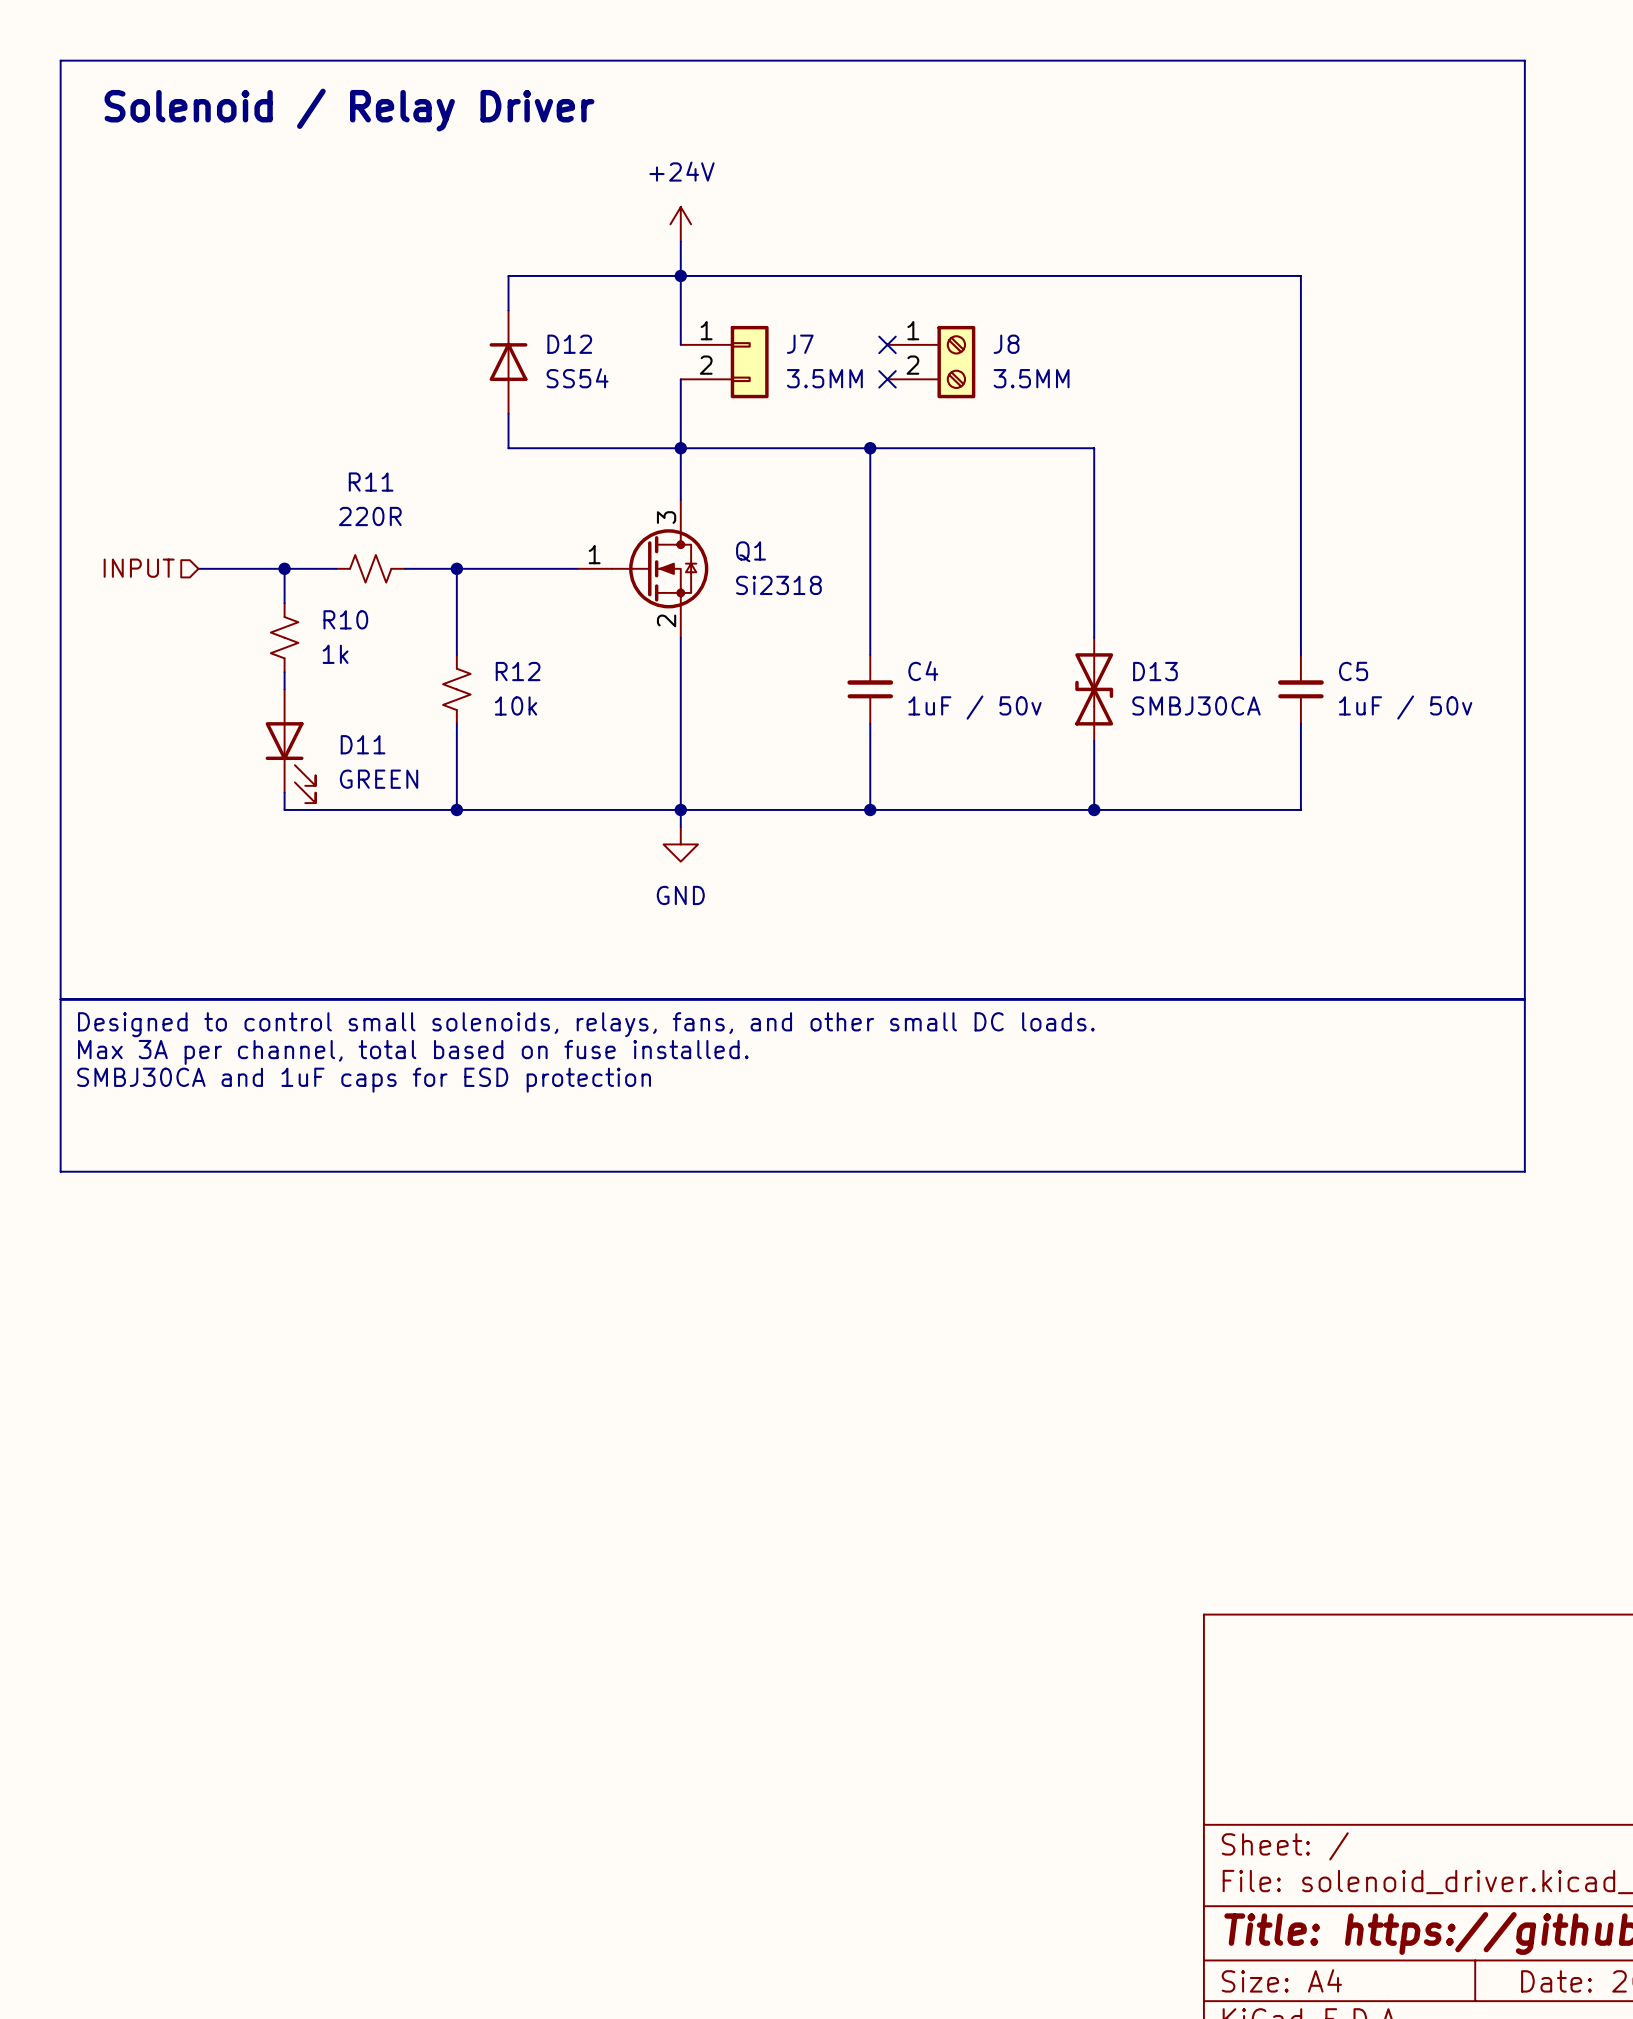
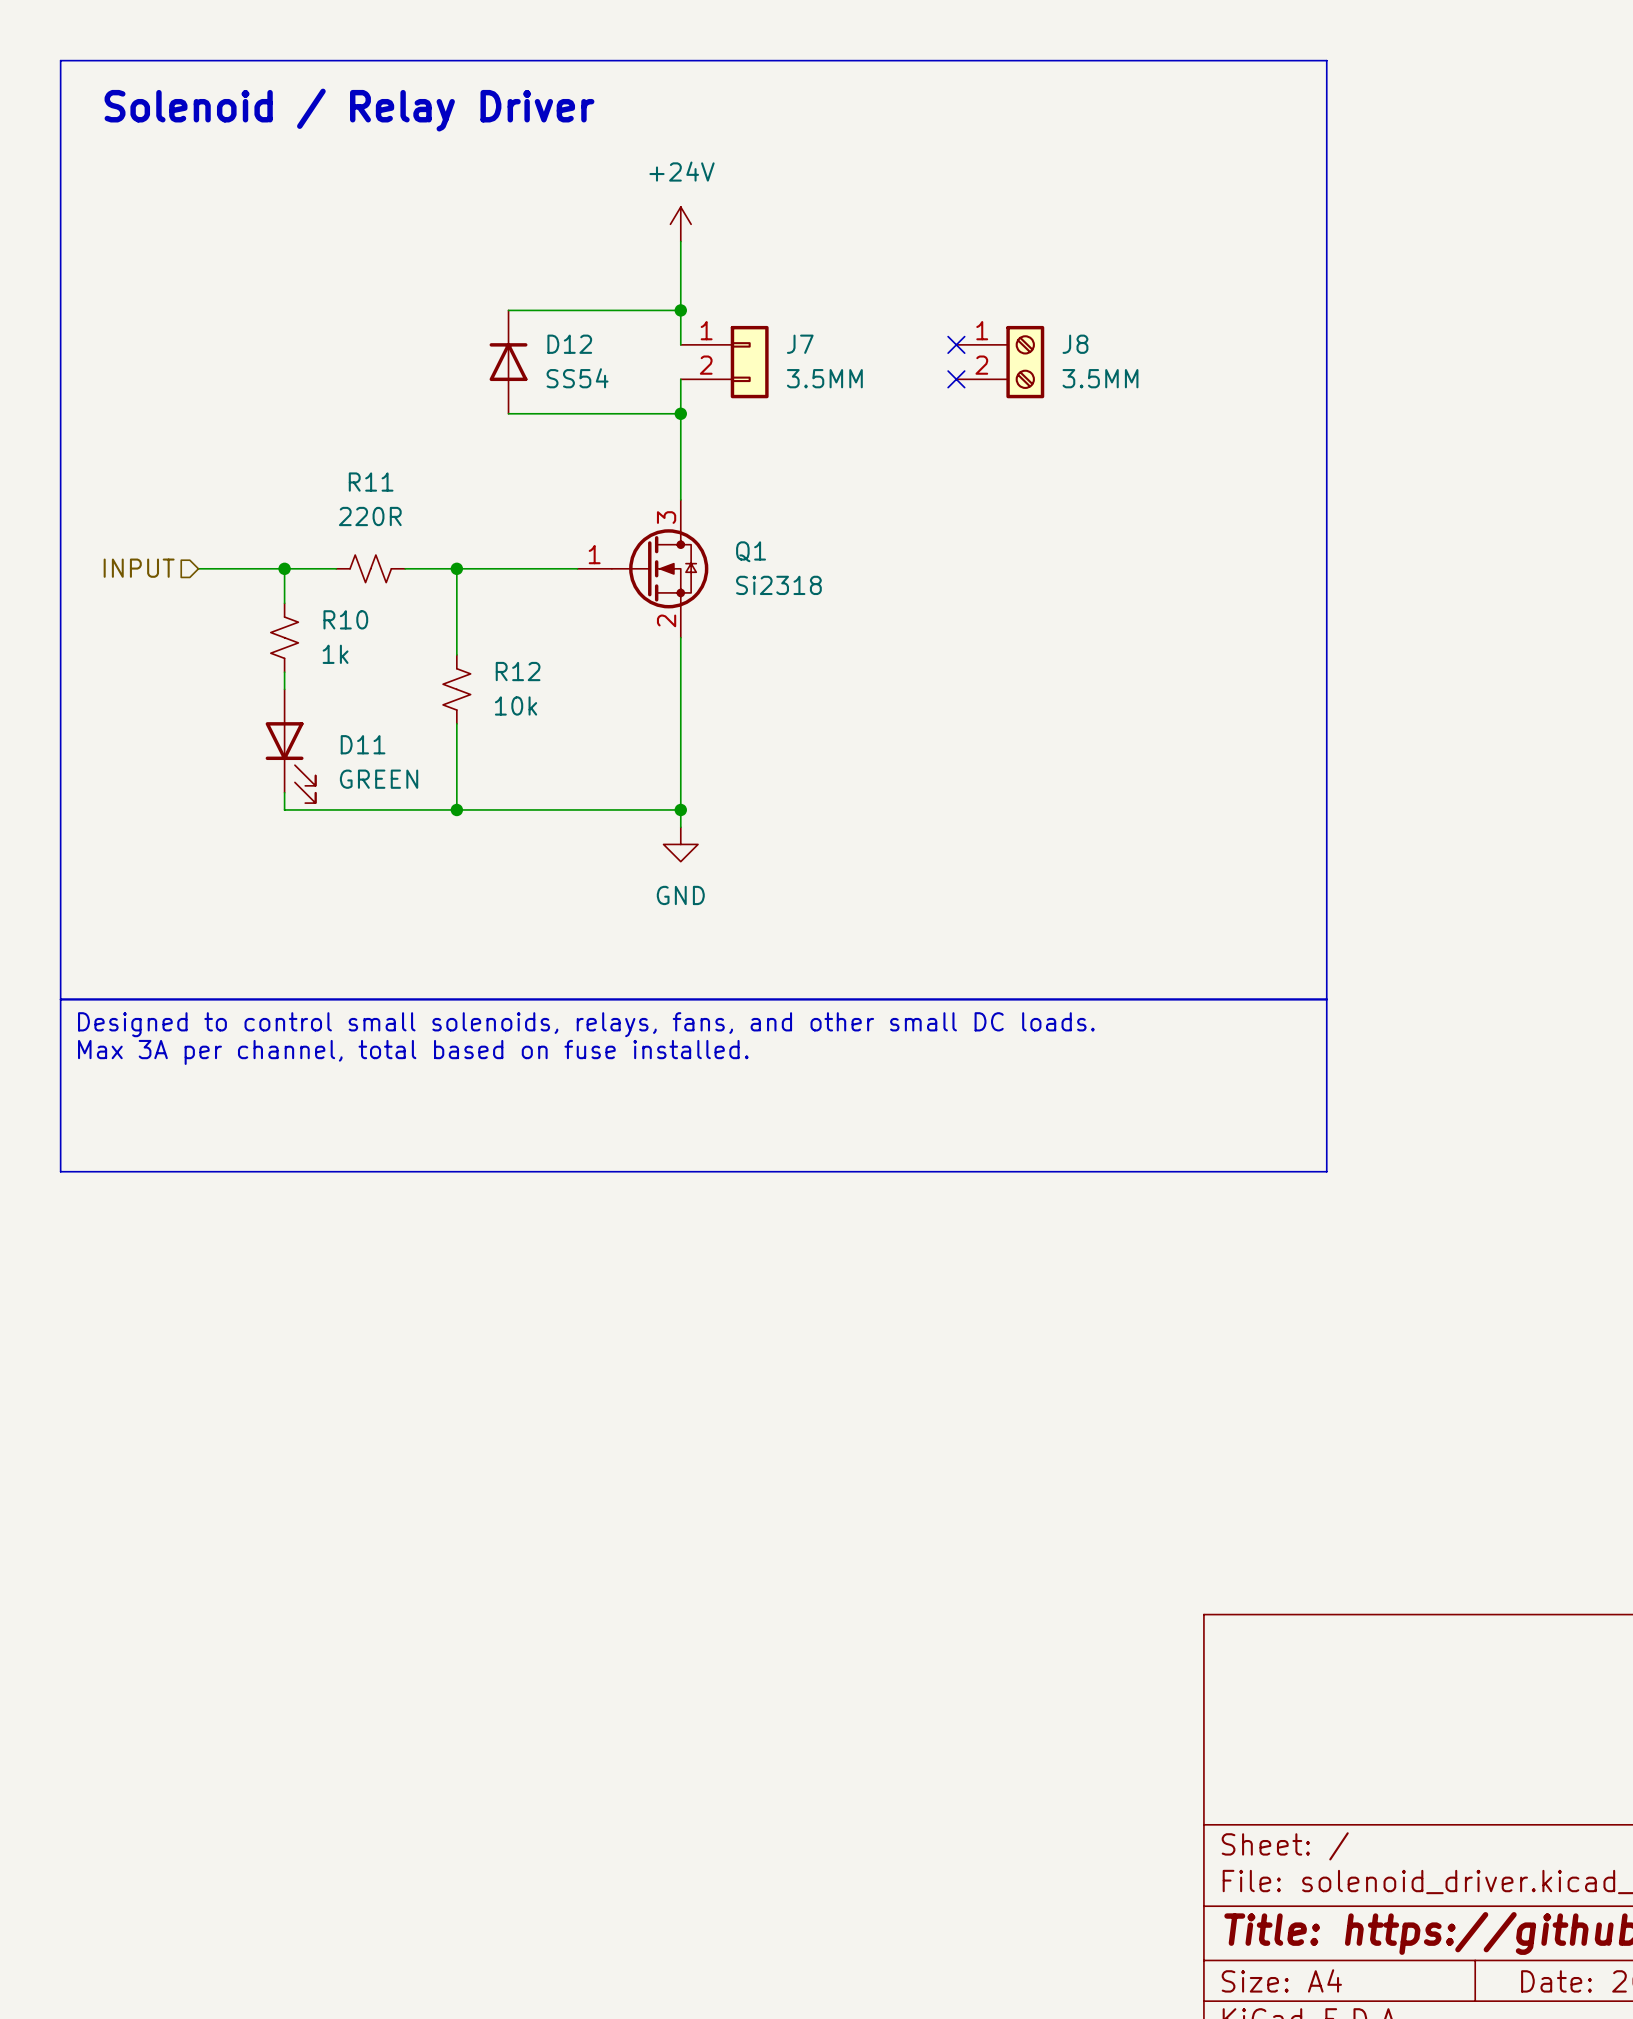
line: (1326, 60) (1524, 60) (1524, 1171) (1326, 1171) -> (1326, 60) (1326, 1171)
junction position: (680, 275) -> (680, 310)
wire: (508, 310) (508, 275) (1300, 275) (1300, 654) -> (508, 310) (680, 310)
no-connect mark: (887, 344) -> none
no-connect mark: none -> (956, 344)
J8 position: (931, 362) -> (1000, 362)
no-connect mark: (887, 379) -> none
no-connect mark: none -> (956, 379)
wire: (508, 413) (508, 448) (1094, 448) (1094, 637) -> (508, 413) (680, 413)
junction position: (680, 448) -> (680, 413)
wire: (870, 448) (870, 654) -> none
junction: (870, 448) -> none
C4: 1uF / 50v (870, 689) -> none
D13: SMBJ30CA (1094, 689) -> none
C5: 1uF / 50v (1300, 689) -> none
wire: (870, 723) (870, 809) -> none
wire: (1300, 723) (1300, 809) (680, 809) -> none
wire: (1094, 741) (1094, 809) -> none
junction: (870, 809) -> none
junction: (1094, 809) -> none
line: (1326, 999) (1524, 999) -> none
text: SMBJ30CA and 1uF caps for ESD protection (364, 1080) -> none

